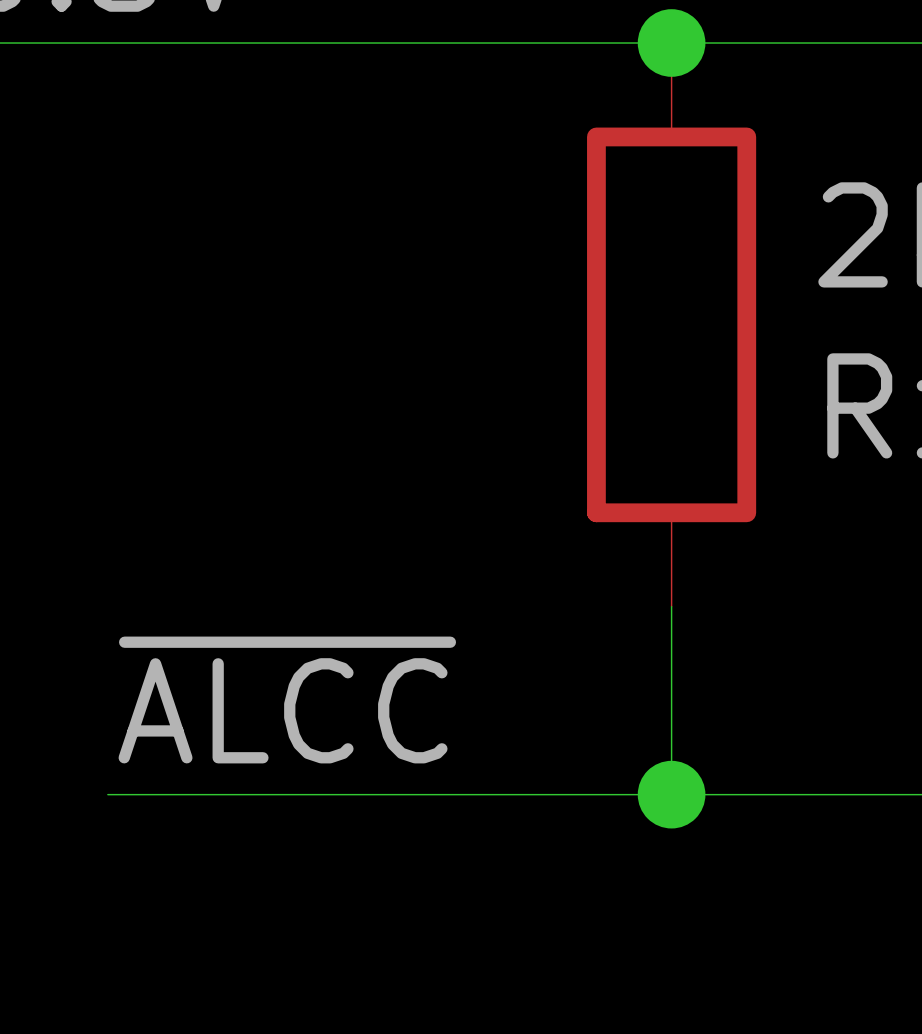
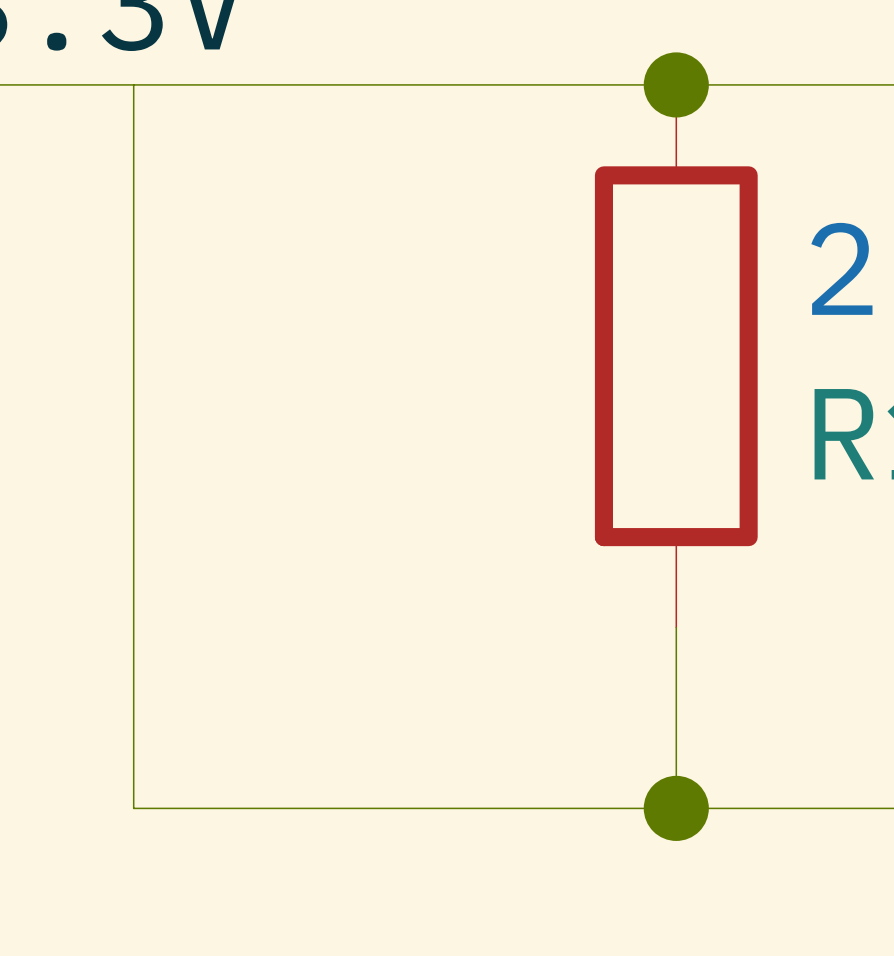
wire: none -> (133, 84) (133, 808)
label: ~{ALCC} (287, 699) -> none

